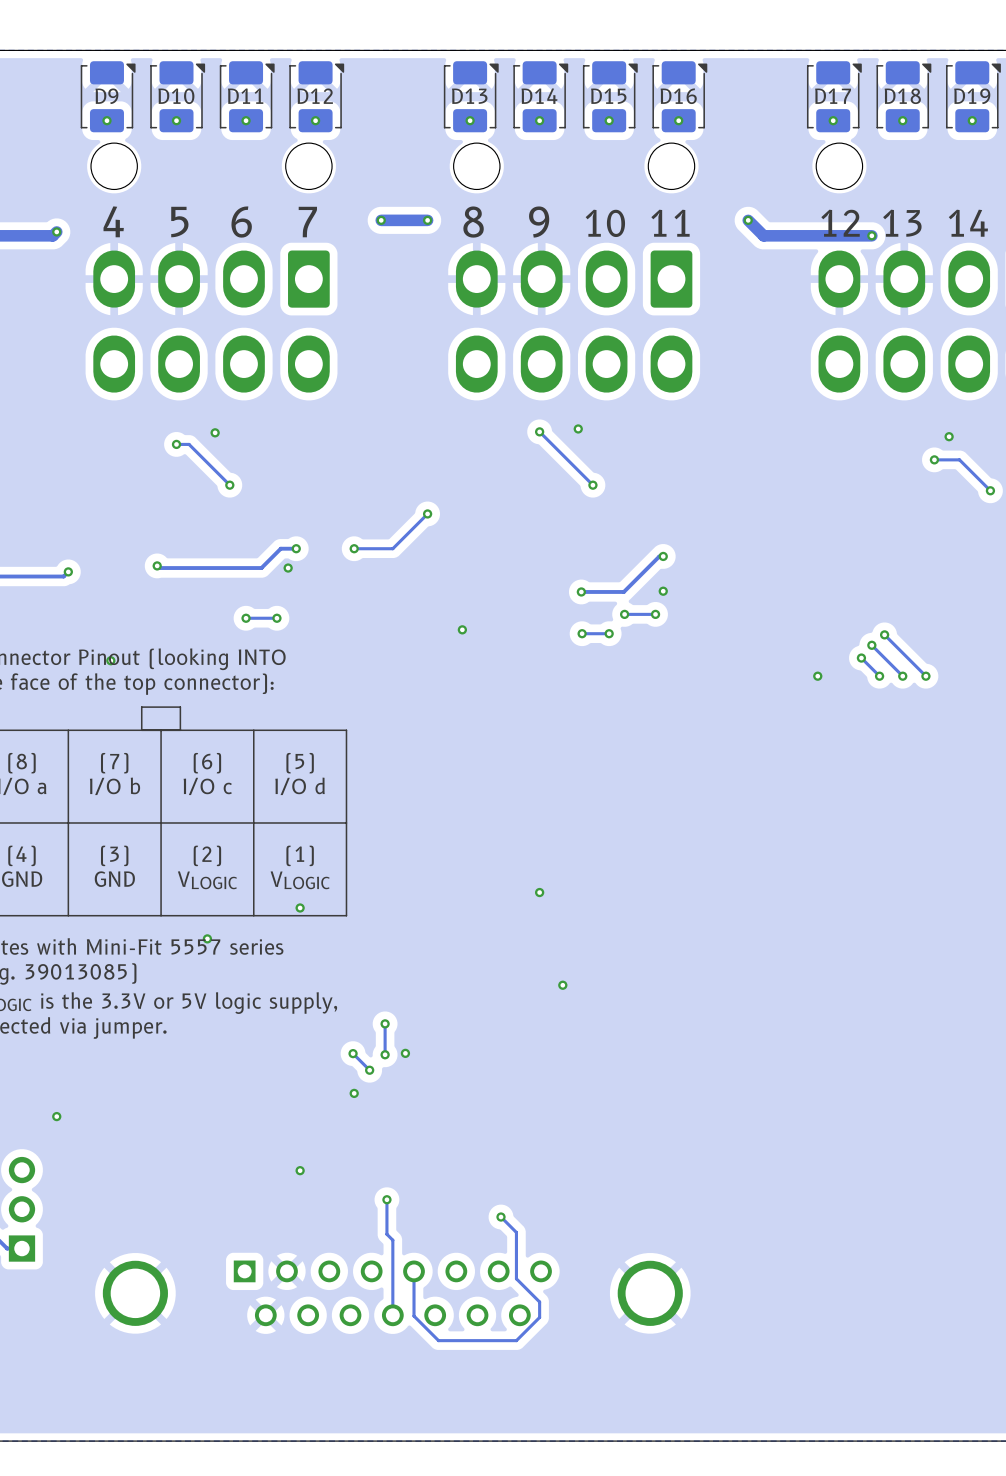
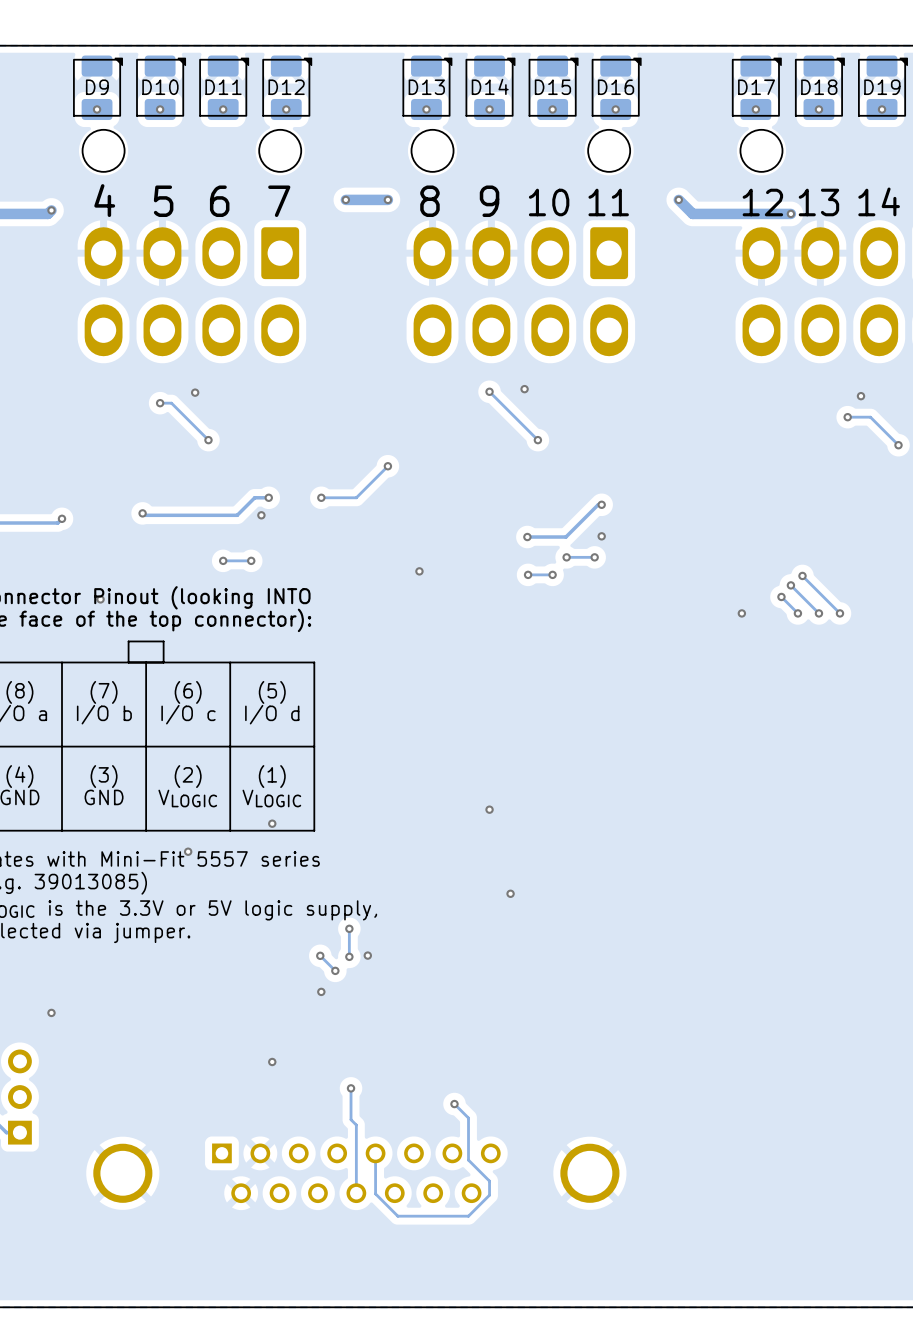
D9 footprint: [80, 61, 136, 133] -> [73, 55, 123, 121]
D10 footprint: [150, 61, 206, 133] -> [136, 55, 187, 121]
D11 footprint: [219, 61, 275, 133] -> [199, 55, 250, 121]
D12 footprint: [289, 61, 345, 133] -> [262, 55, 313, 121]
D13 footprint: [443, 61, 499, 133] -> [402, 55, 453, 121]
D14 footprint: [513, 61, 569, 133] -> [465, 55, 516, 121]
D15 footprint: [582, 61, 638, 133] -> [528, 55, 579, 121]
D16 footprint: [652, 61, 708, 133] -> [591, 55, 642, 121]
D17 footprint: [806, 61, 862, 133] -> [732, 55, 782, 121]
D18 footprint: [876, 61, 932, 133] -> [795, 55, 845, 121]
D19 footprint: [946, 61, 1001, 133] -> [858, 55, 908, 121]

